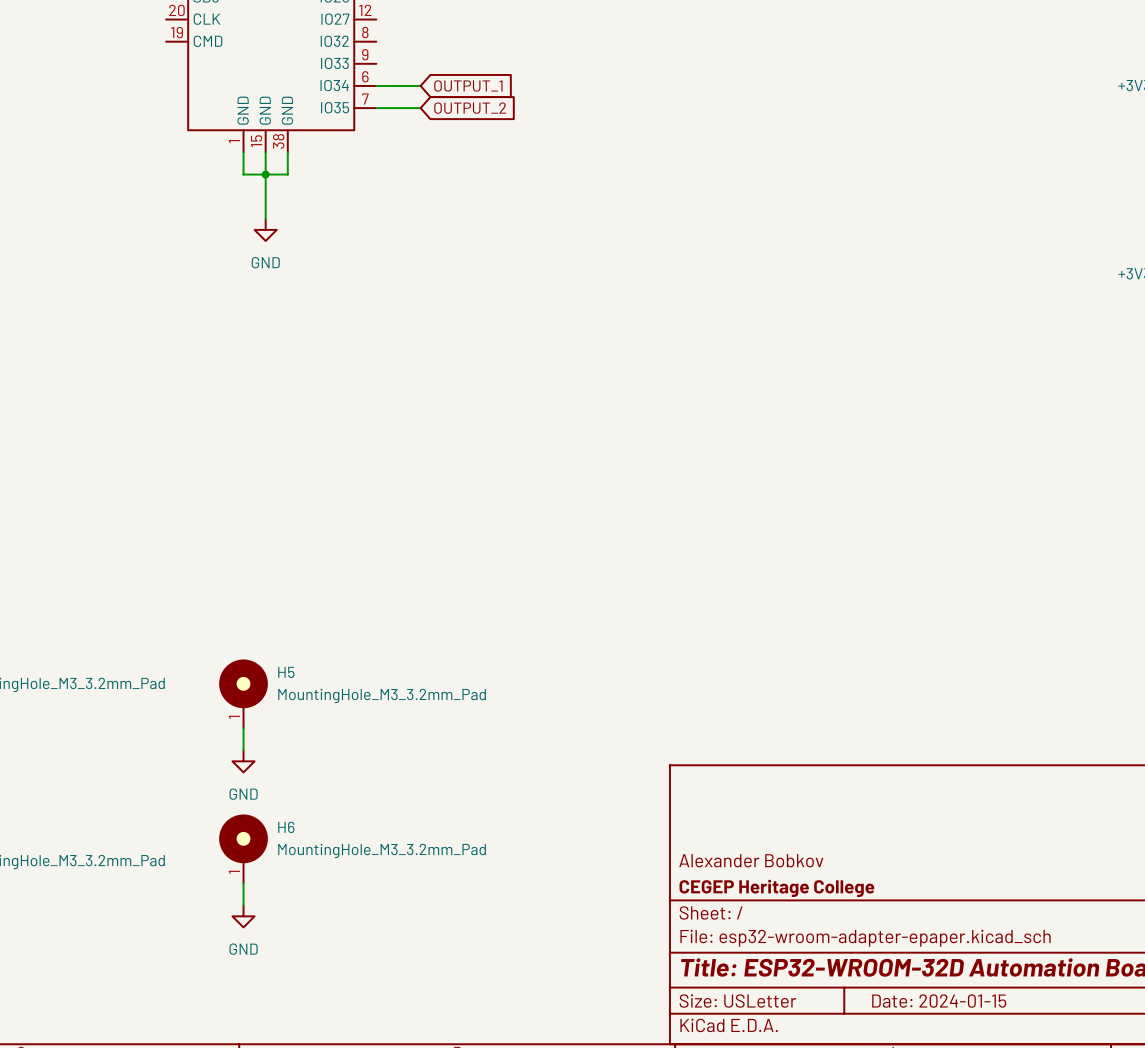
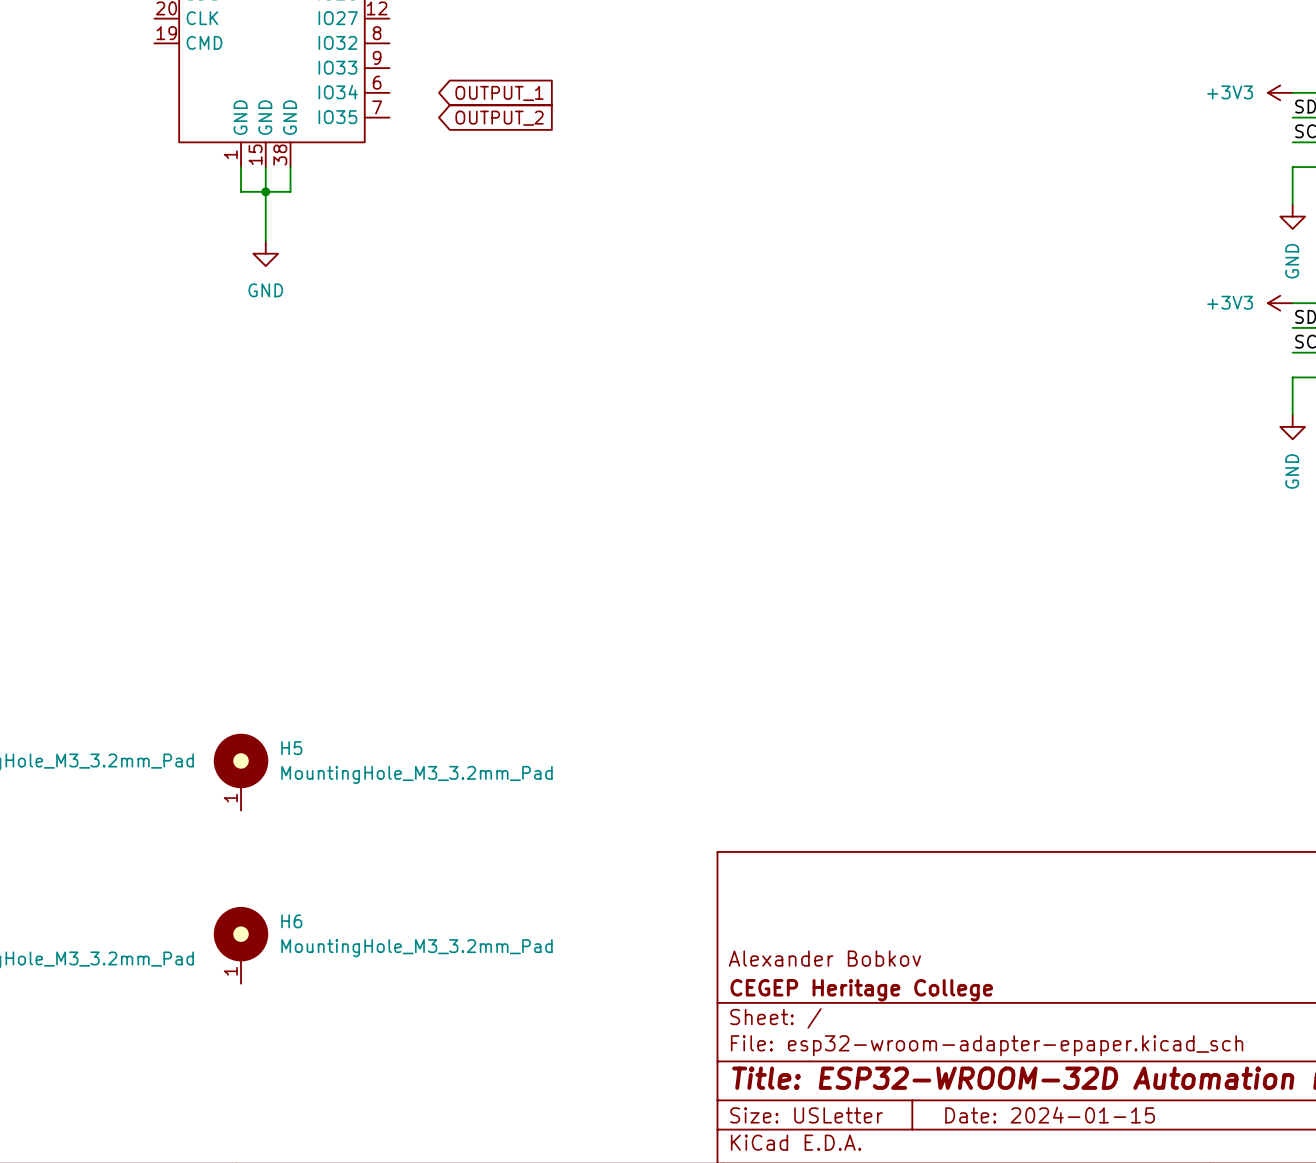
wire: (376, 85) (420, 85) -> none
wire: (376, 108) (420, 108) -> none
wire: (243, 728) (243, 750) -> none
power symbol: GND (243, 761) -> none
wire: (243, 883) (243, 905) -> none
power symbol: GND (243, 916) -> none

